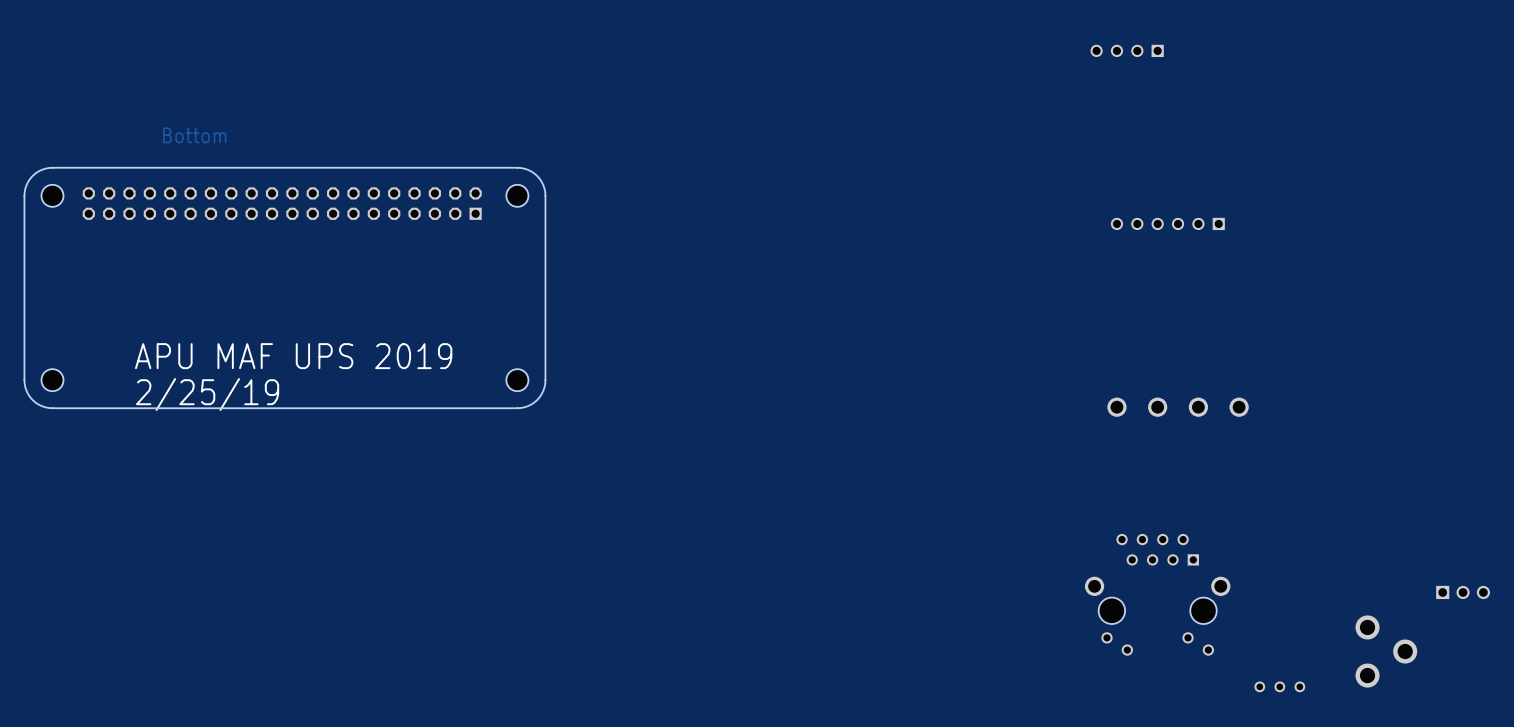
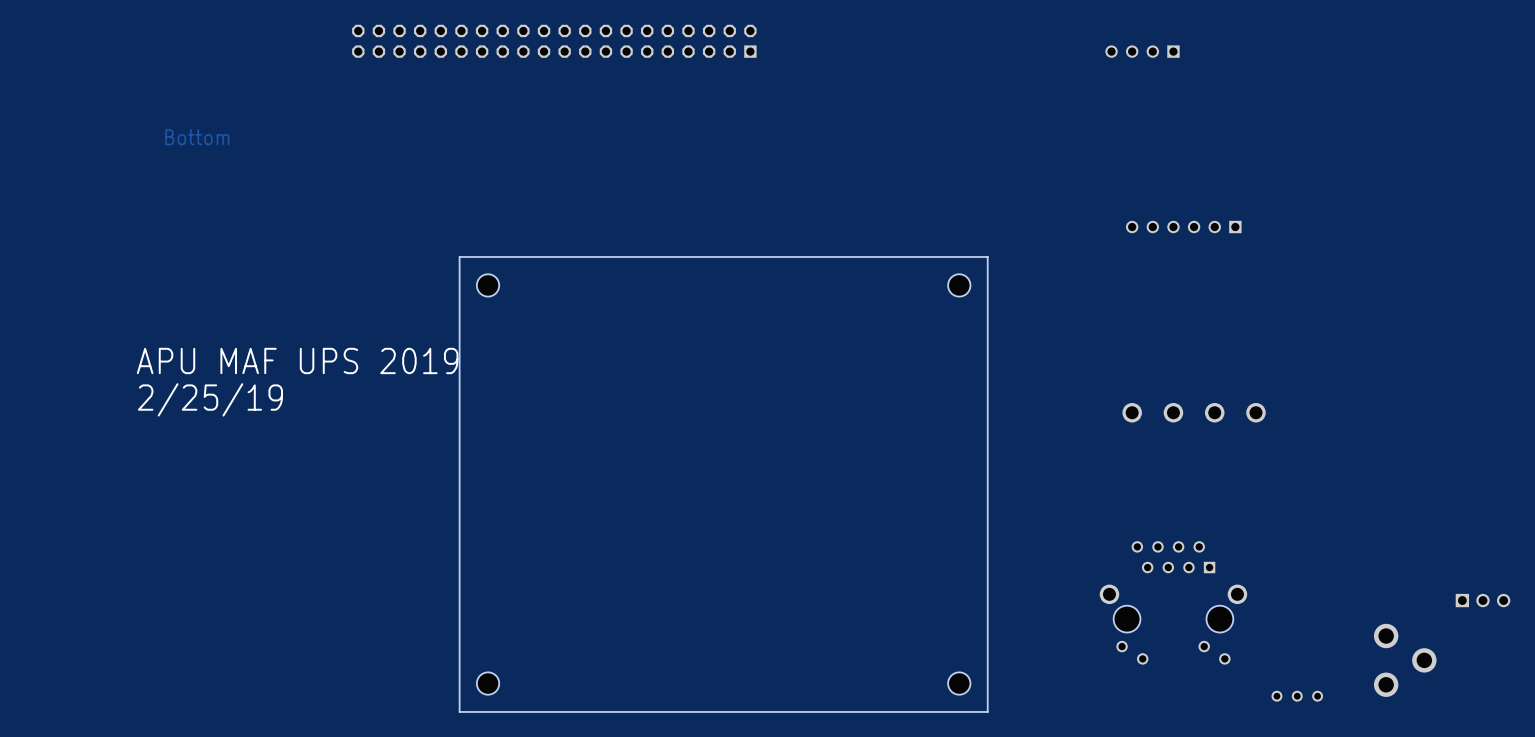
part: none -> (554, 41)
board edge: (517, 167) (52, 167) (41, 169) (30, 178) (24, 192) (24, 380) (26, 390) (38, 404) (52, 408) (517, 408) (528, 406) (539, 397) (545, 383) (545, 195) (543, 185) (537, 175) (528, 169) (517, 167) -> none
hole: (52, 195) -> none
hole: (517, 195) -> none
part: (282, 203) -> none
board edge: none -> (987, 256) (459, 256) (459, 711) (987, 711) (987, 256)
hole: none -> (488, 285)
hole: none -> (959, 285)
hole: (52, 380) -> none
hole: (517, 380) -> none
hole: none -> (488, 683)
hole: none -> (959, 683)

